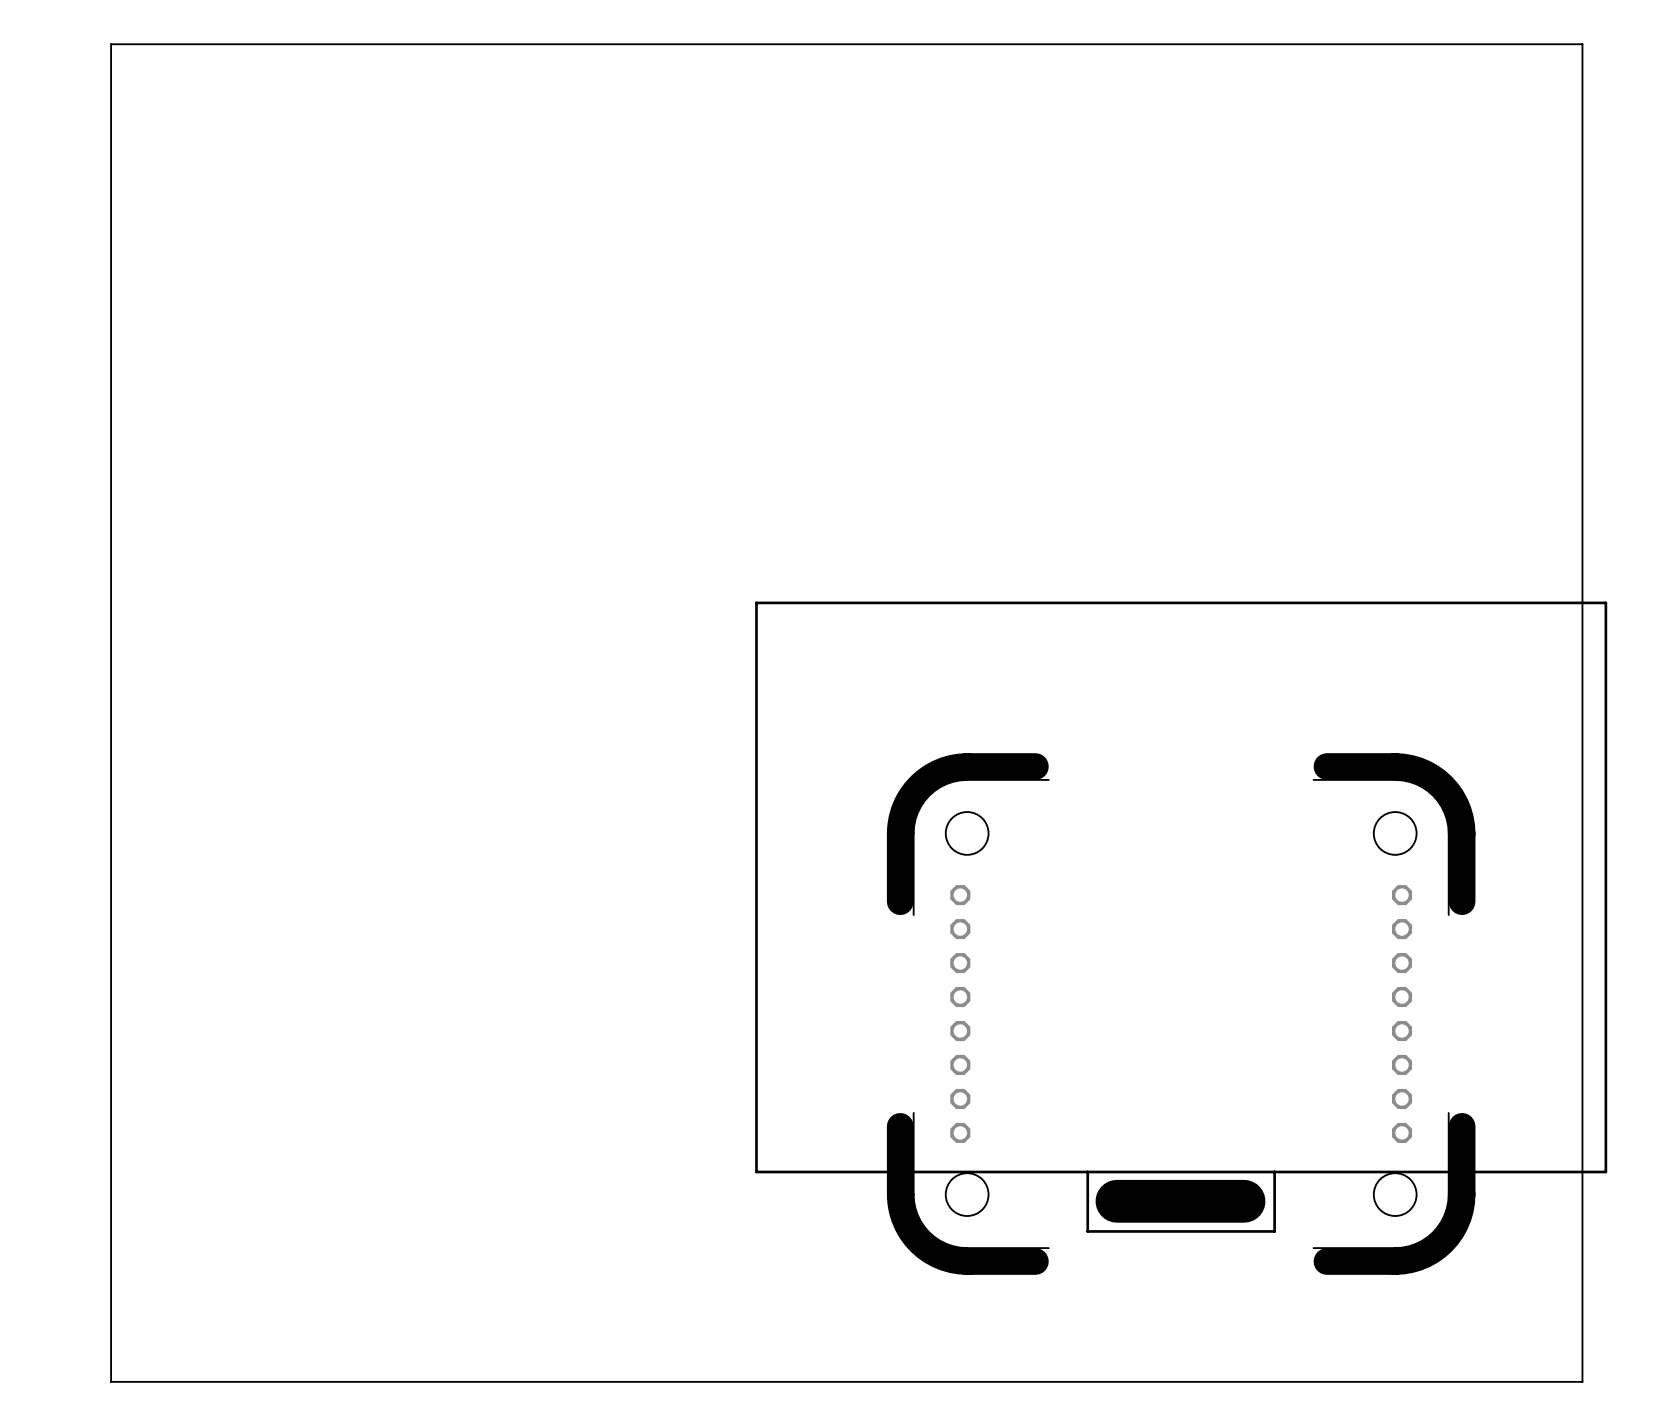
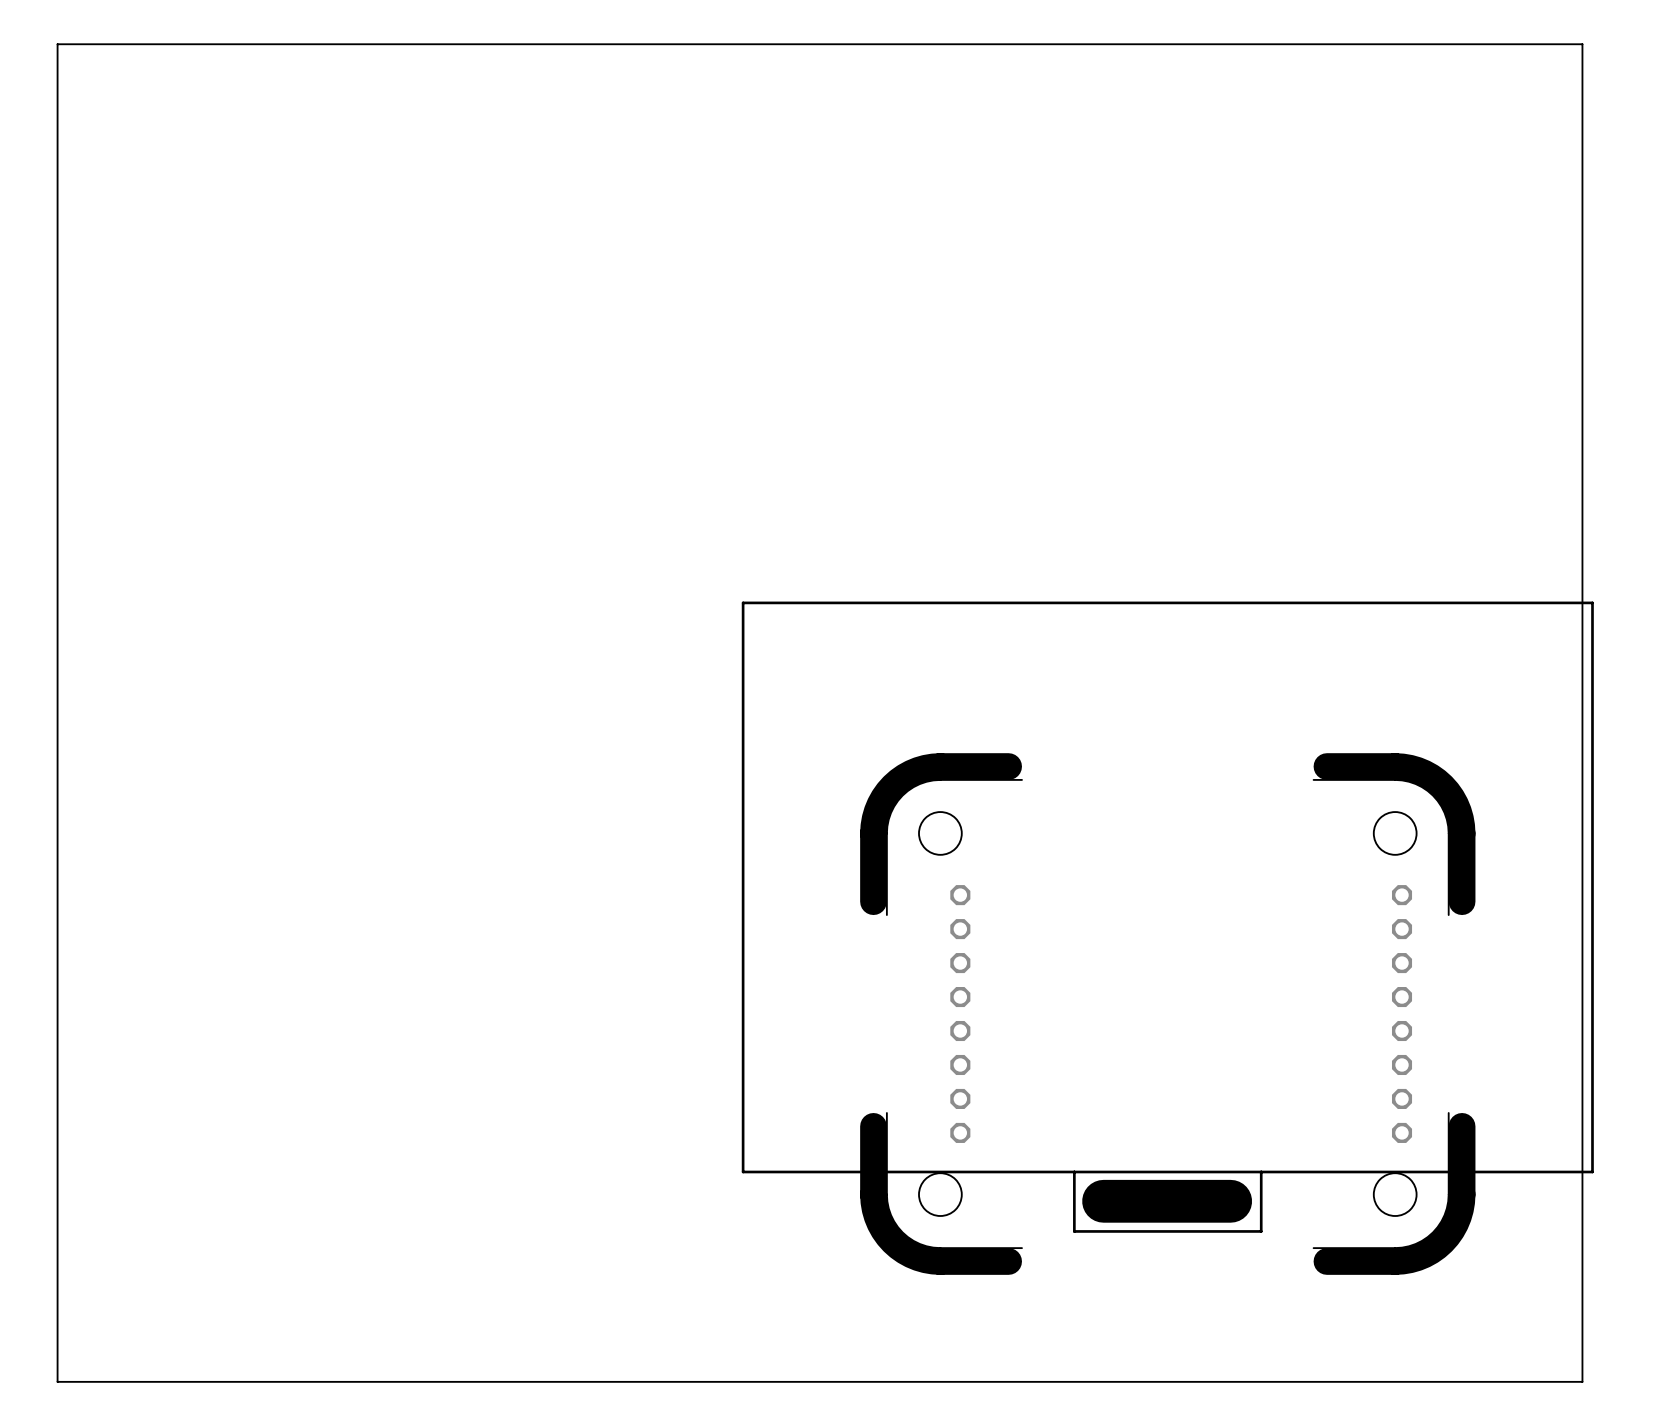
board edge: (111, 44) (111, 1381) -> (111, 44) (57, 44) (57, 1381) (111, 1381)
part position: (967, 834) -> (941, 834)
part position: (1181, 917) -> (1167, 917)
part position: (967, 1193) -> (941, 1193)

